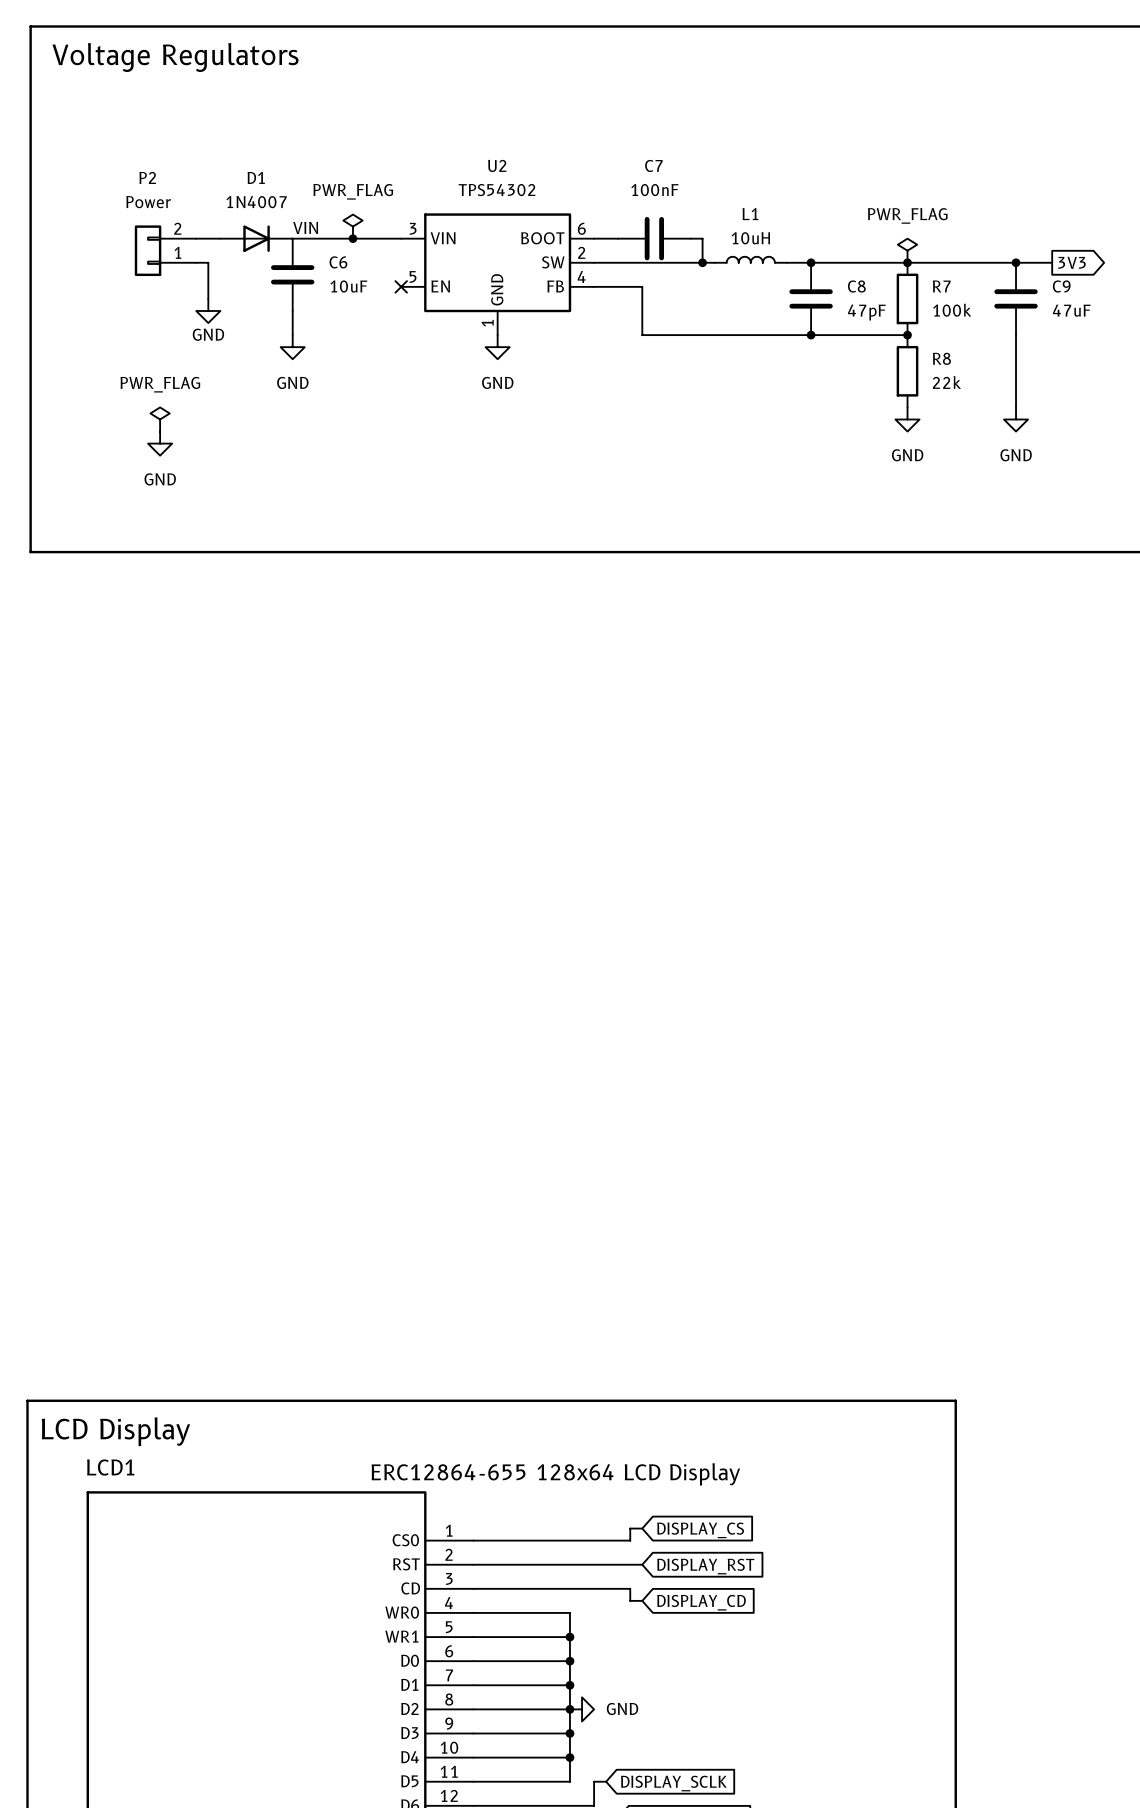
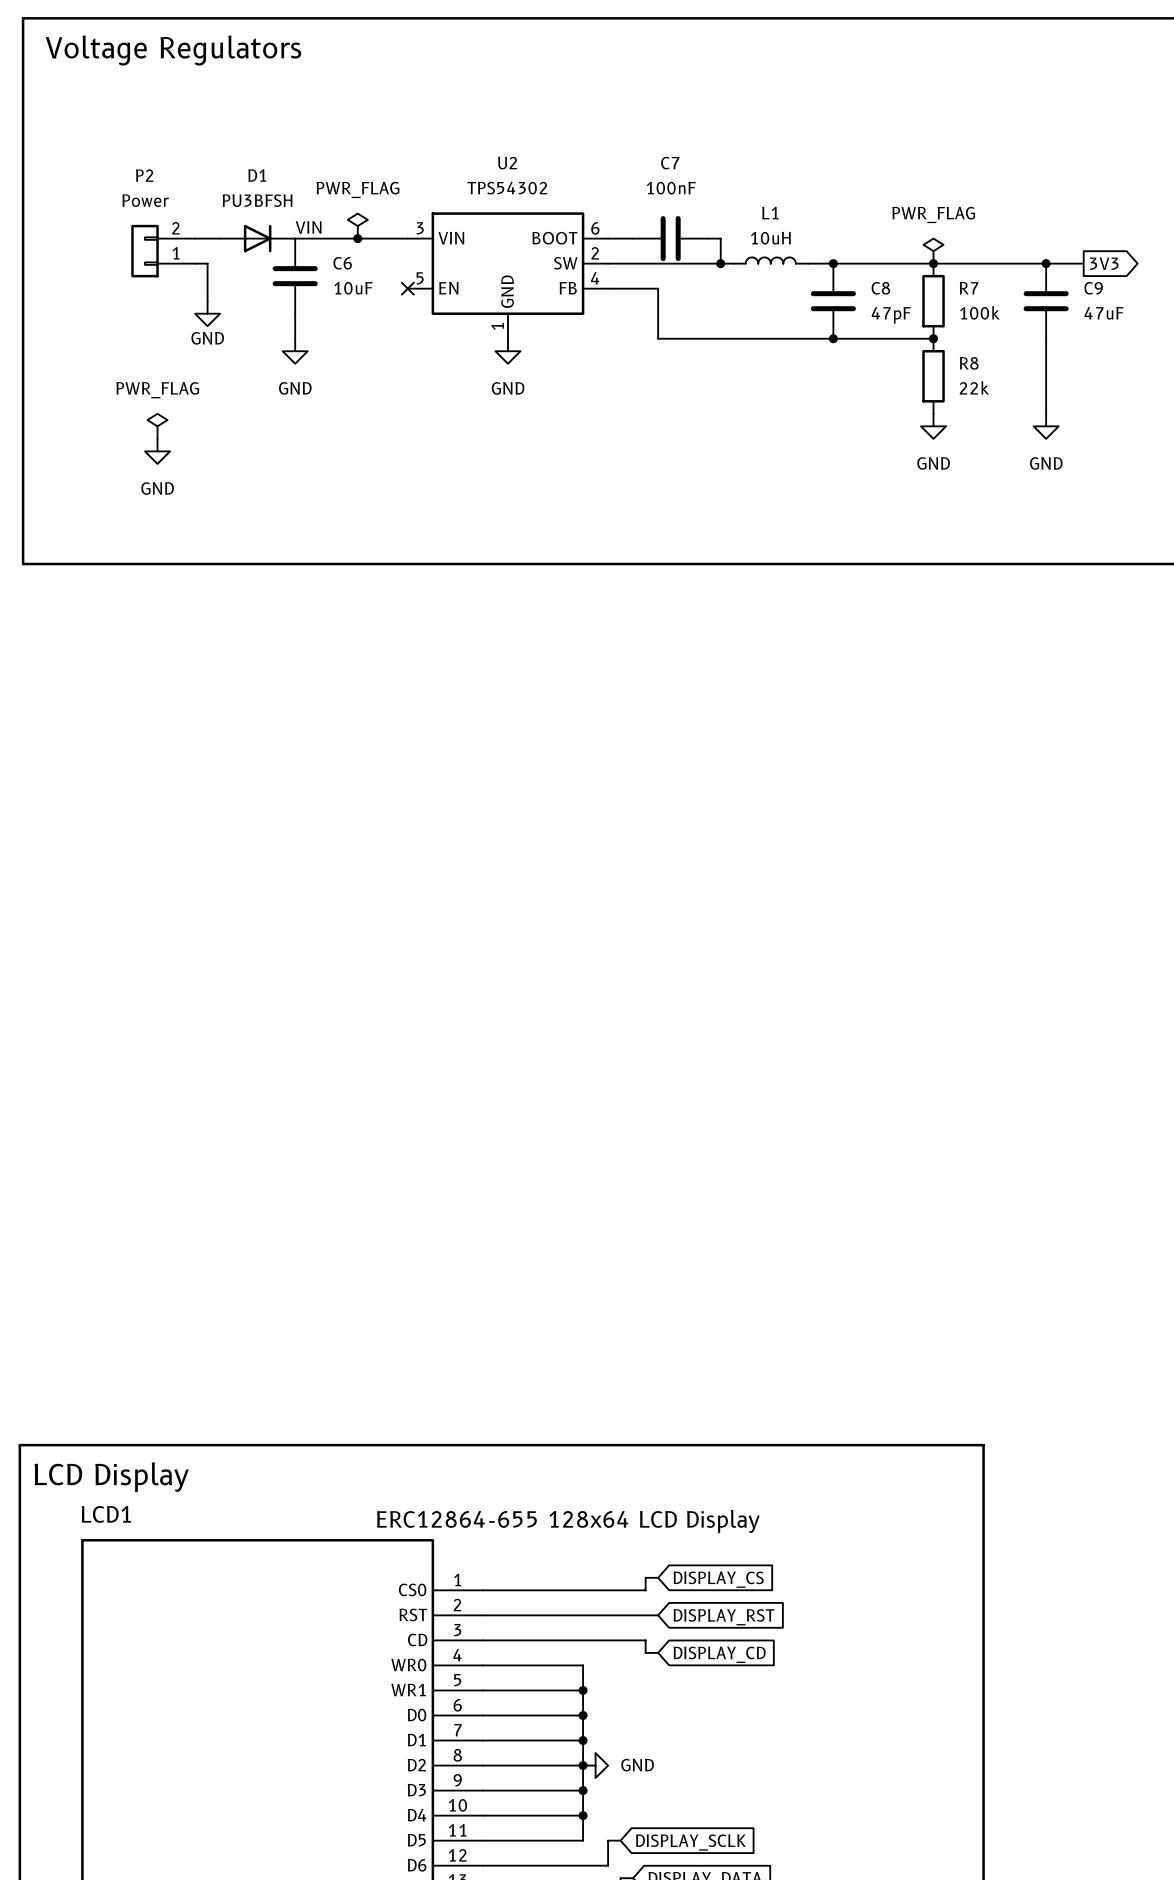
D1 value: 1N4007 (256, 202) -> PU3BFSH (257, 200)

